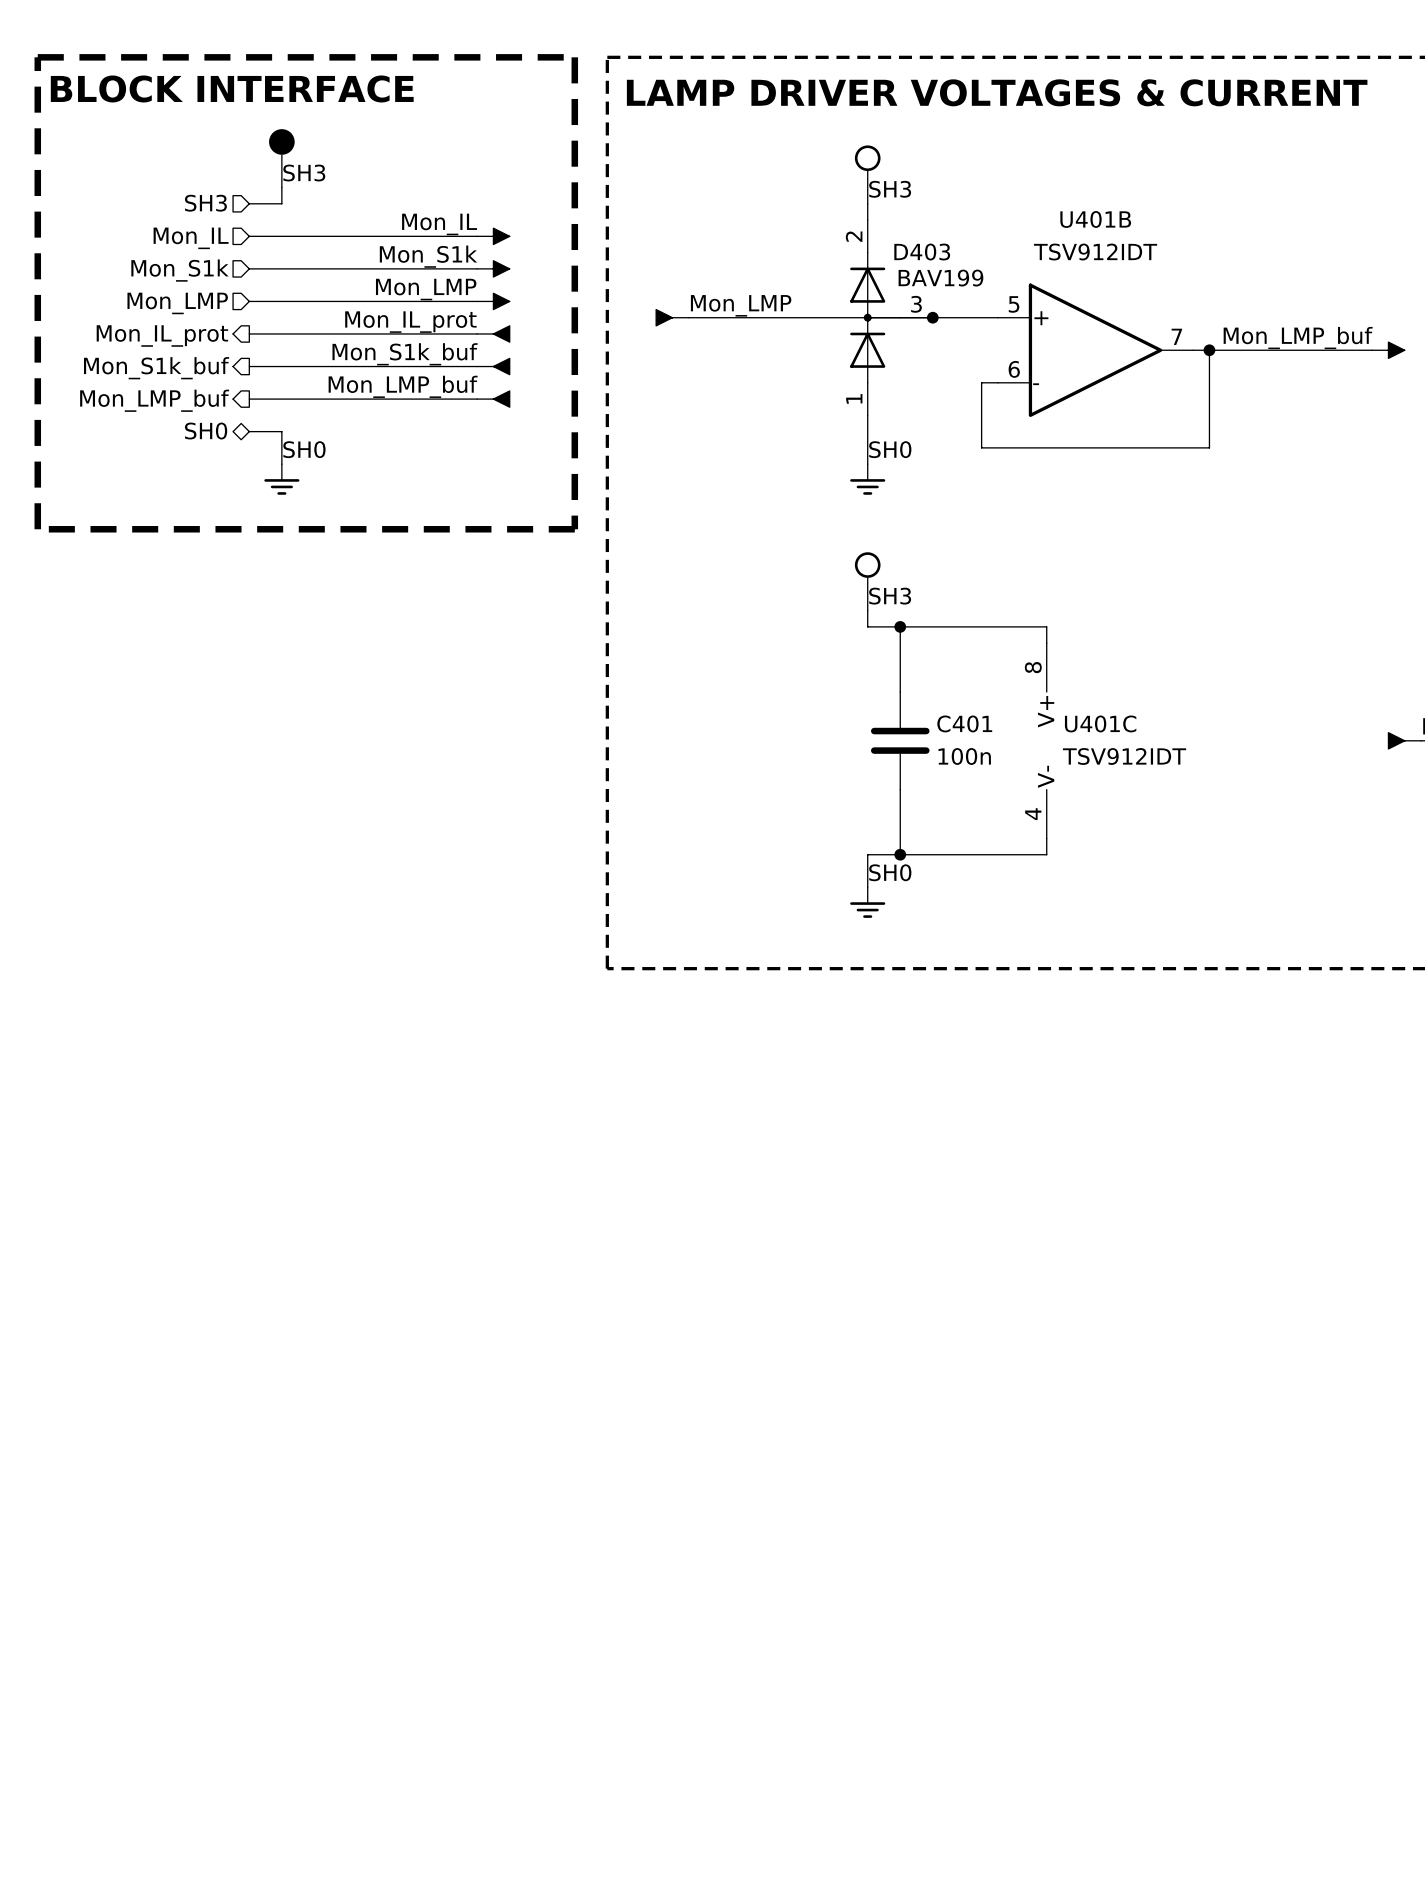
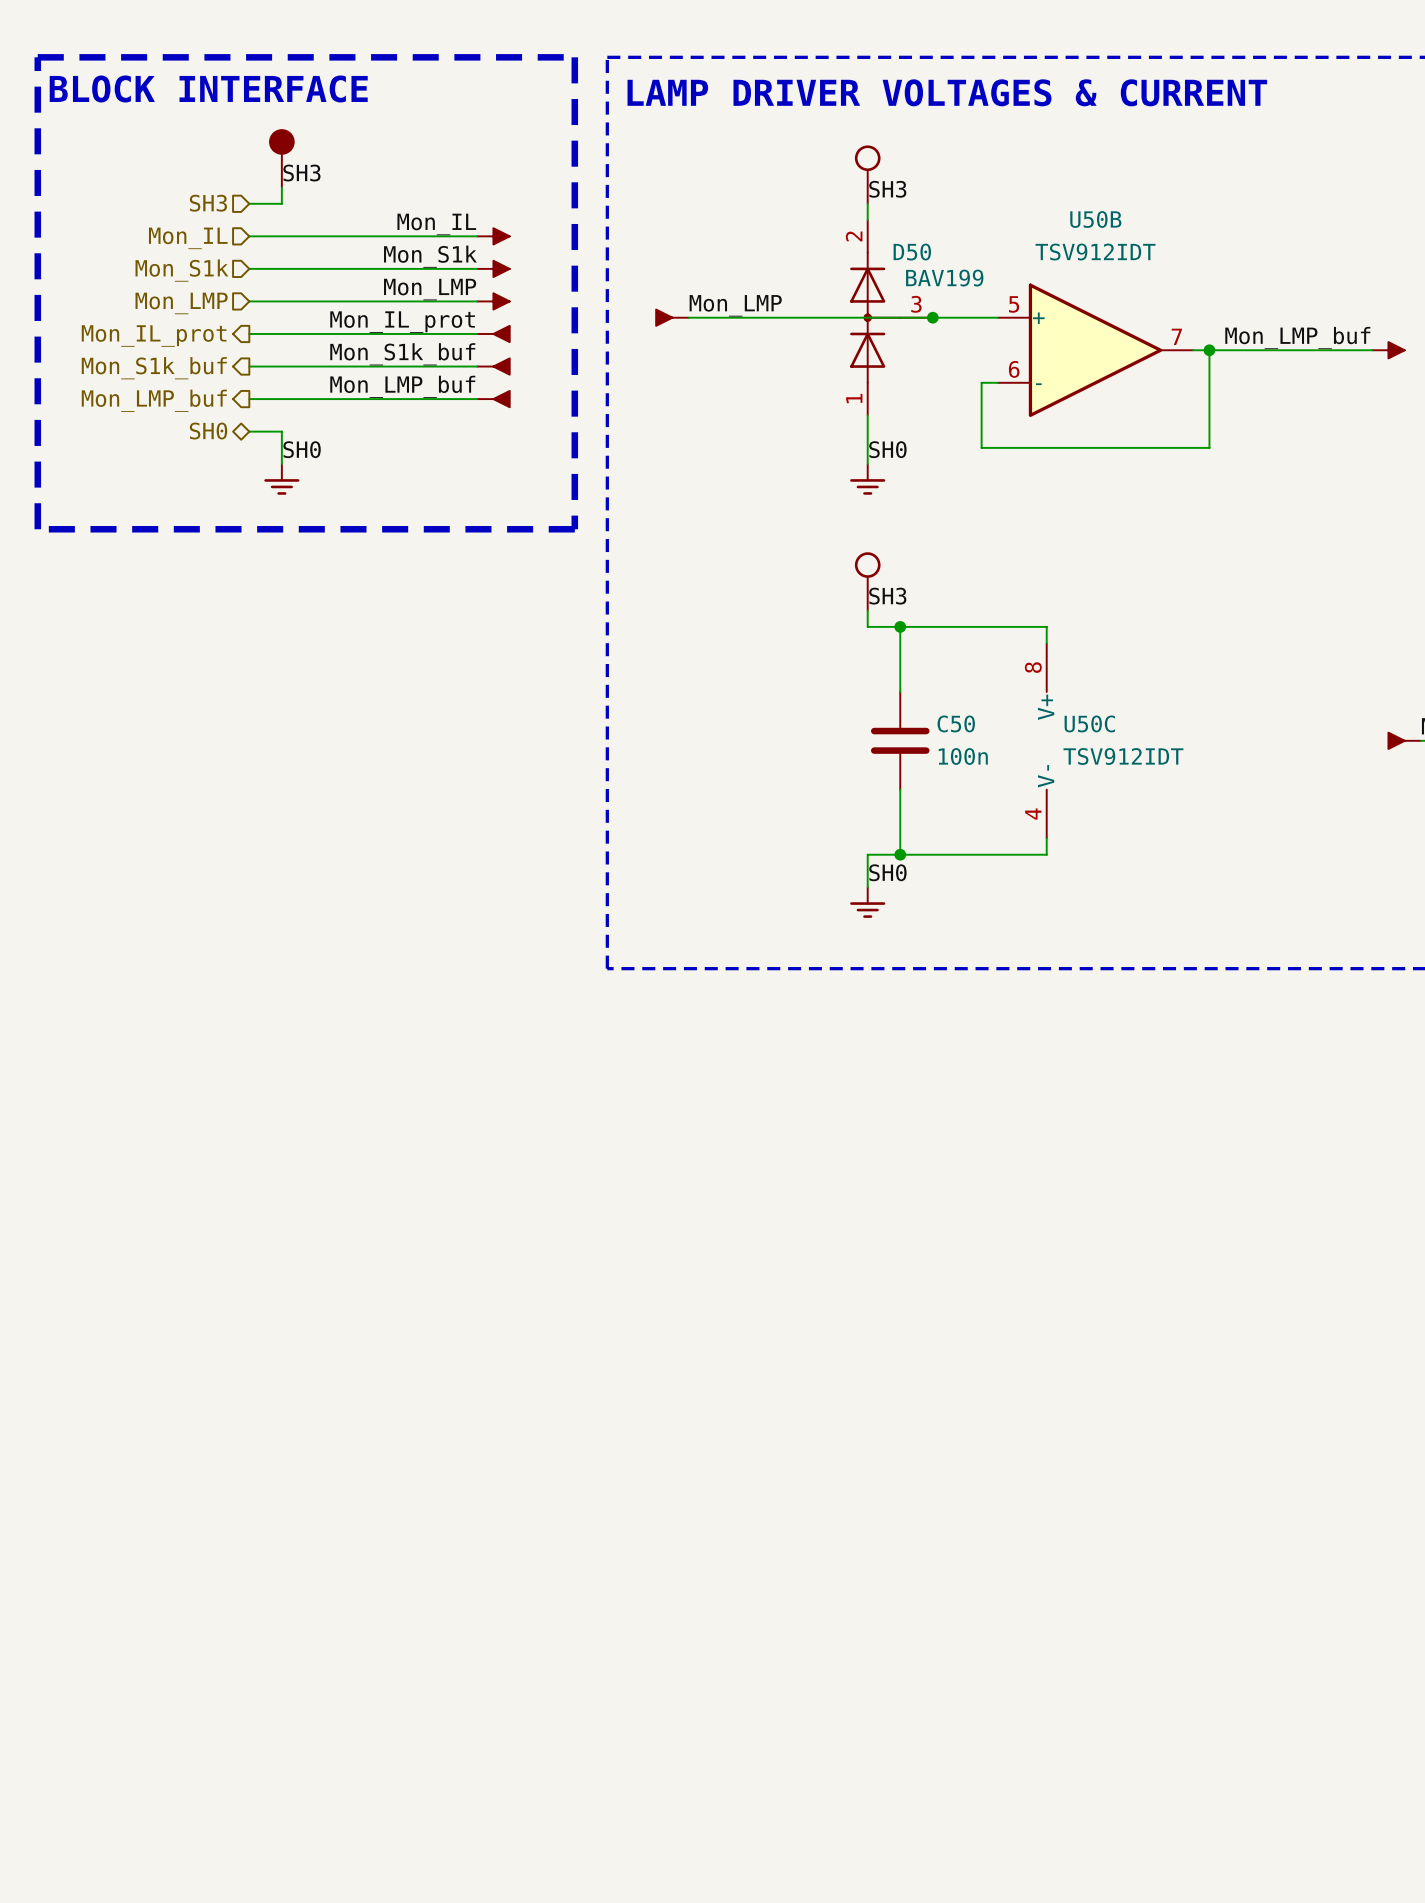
U401B name: U401B (1095, 219) -> U50B (1095, 219)
D403 name: D403 (922, 252) -> D50 (912, 252)
C401 name: C401 (964, 723) -> C50 (956, 723)
U401C name: U401C (1100, 723) -> U50C (1089, 723)

